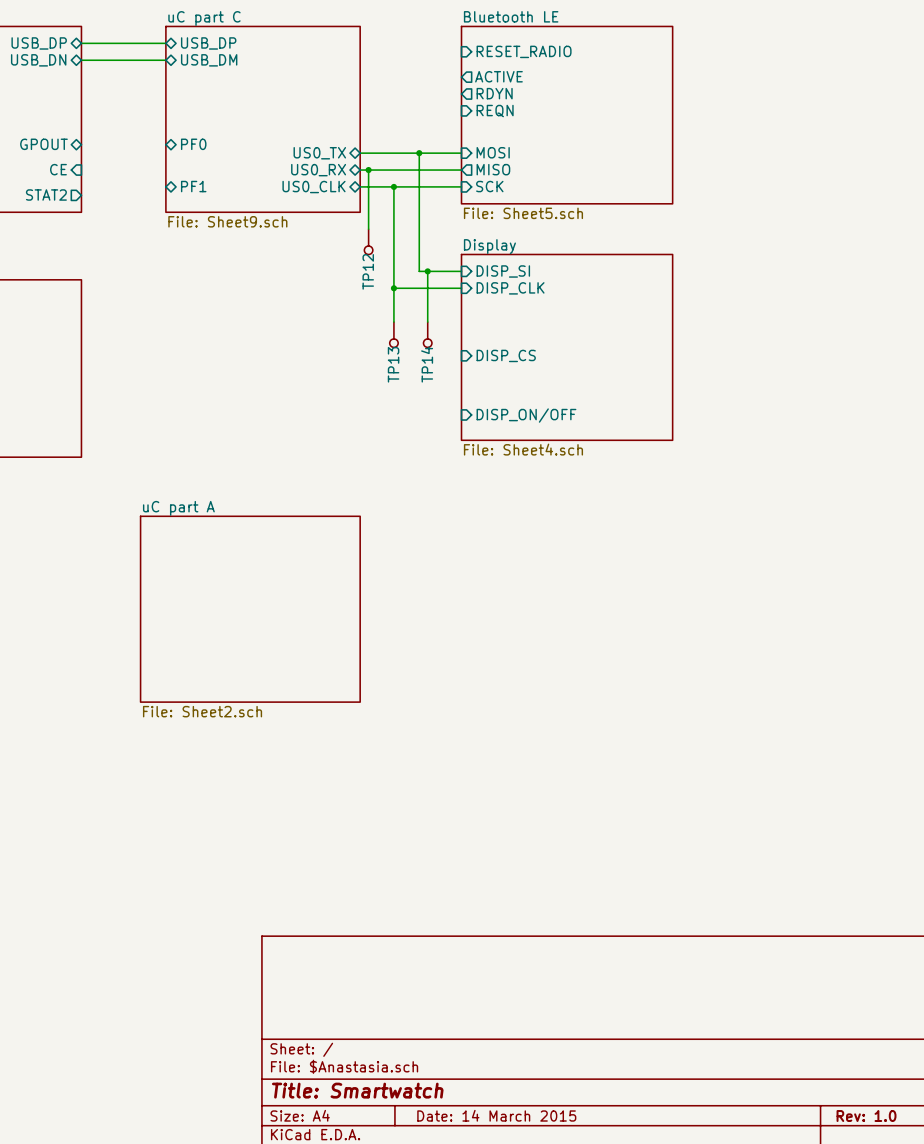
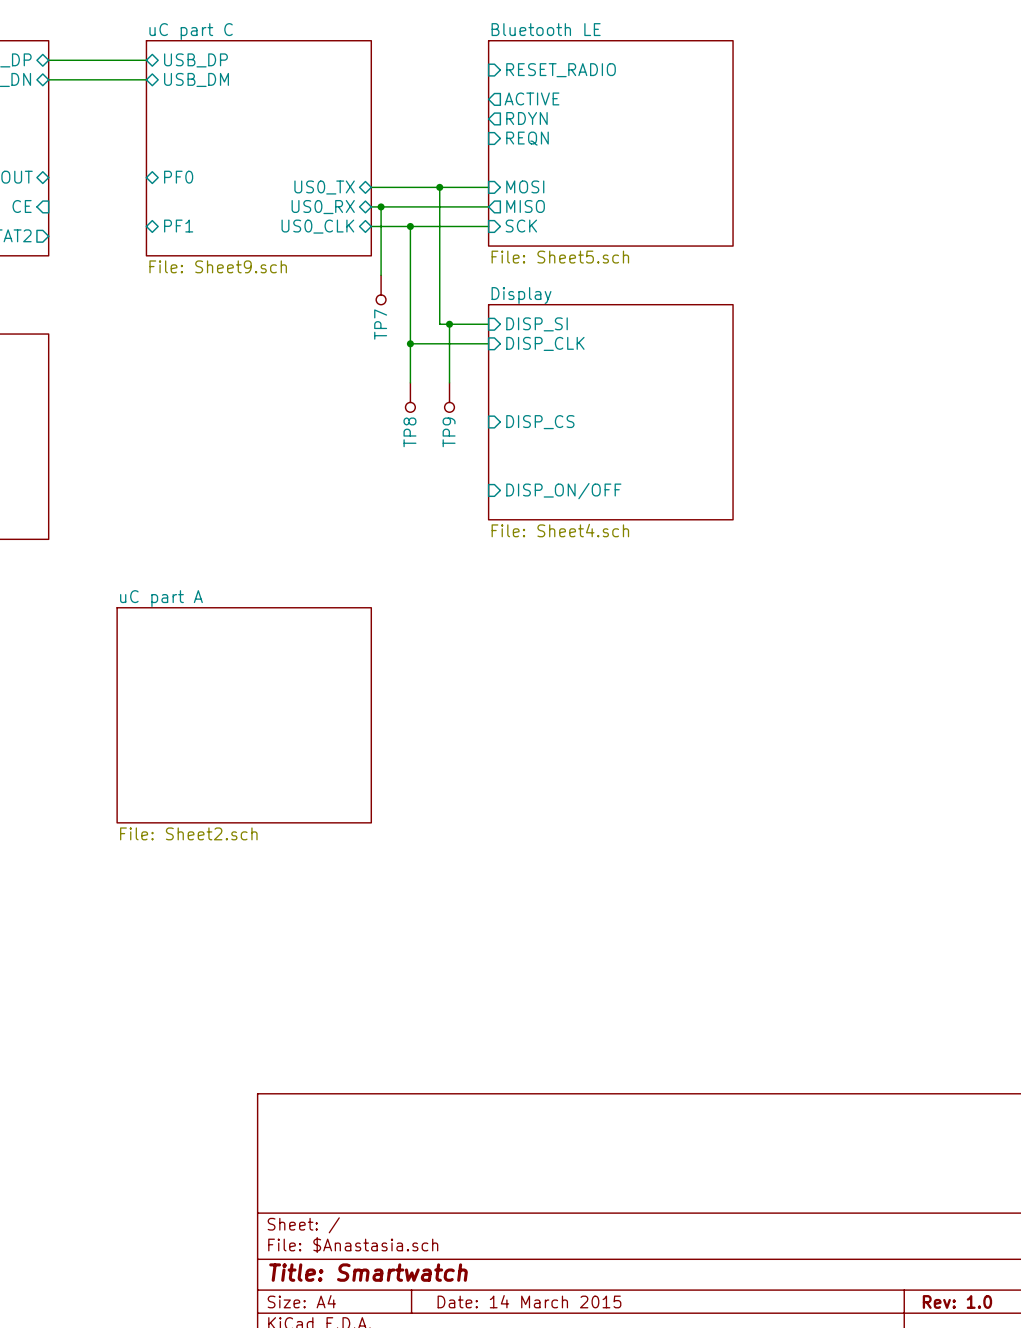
TP12 name: TP12 (368, 271) -> TP7 (380, 324)
TP13 name: TP13 (393, 364) -> TP8 (409, 432)
TP14 name: TP14 (427, 364) -> TP9 (449, 432)

